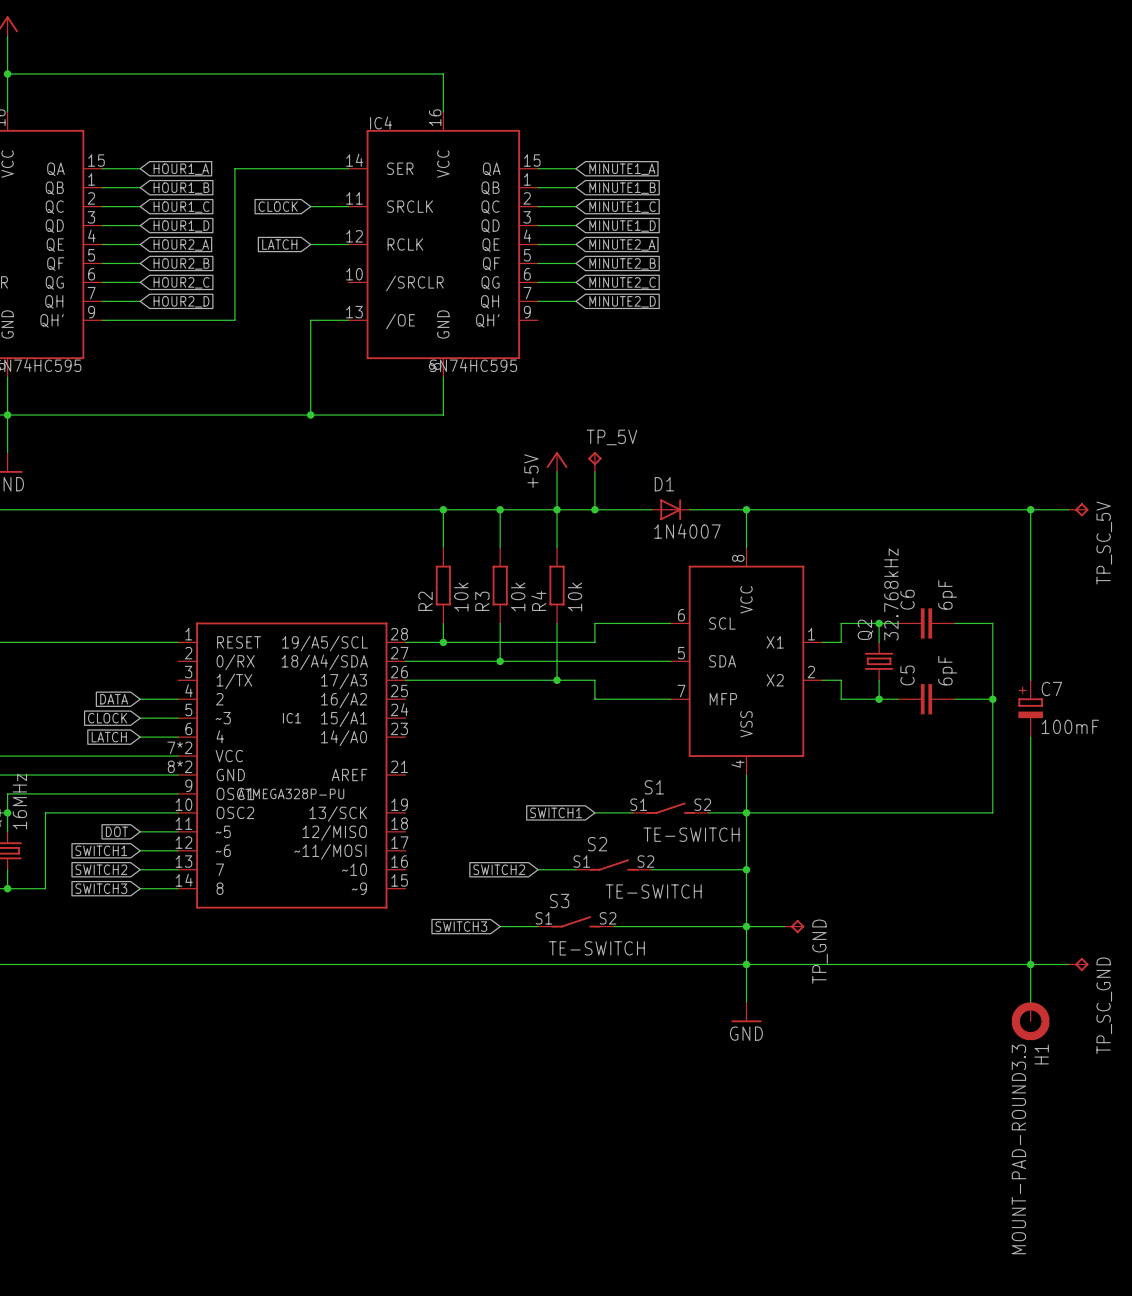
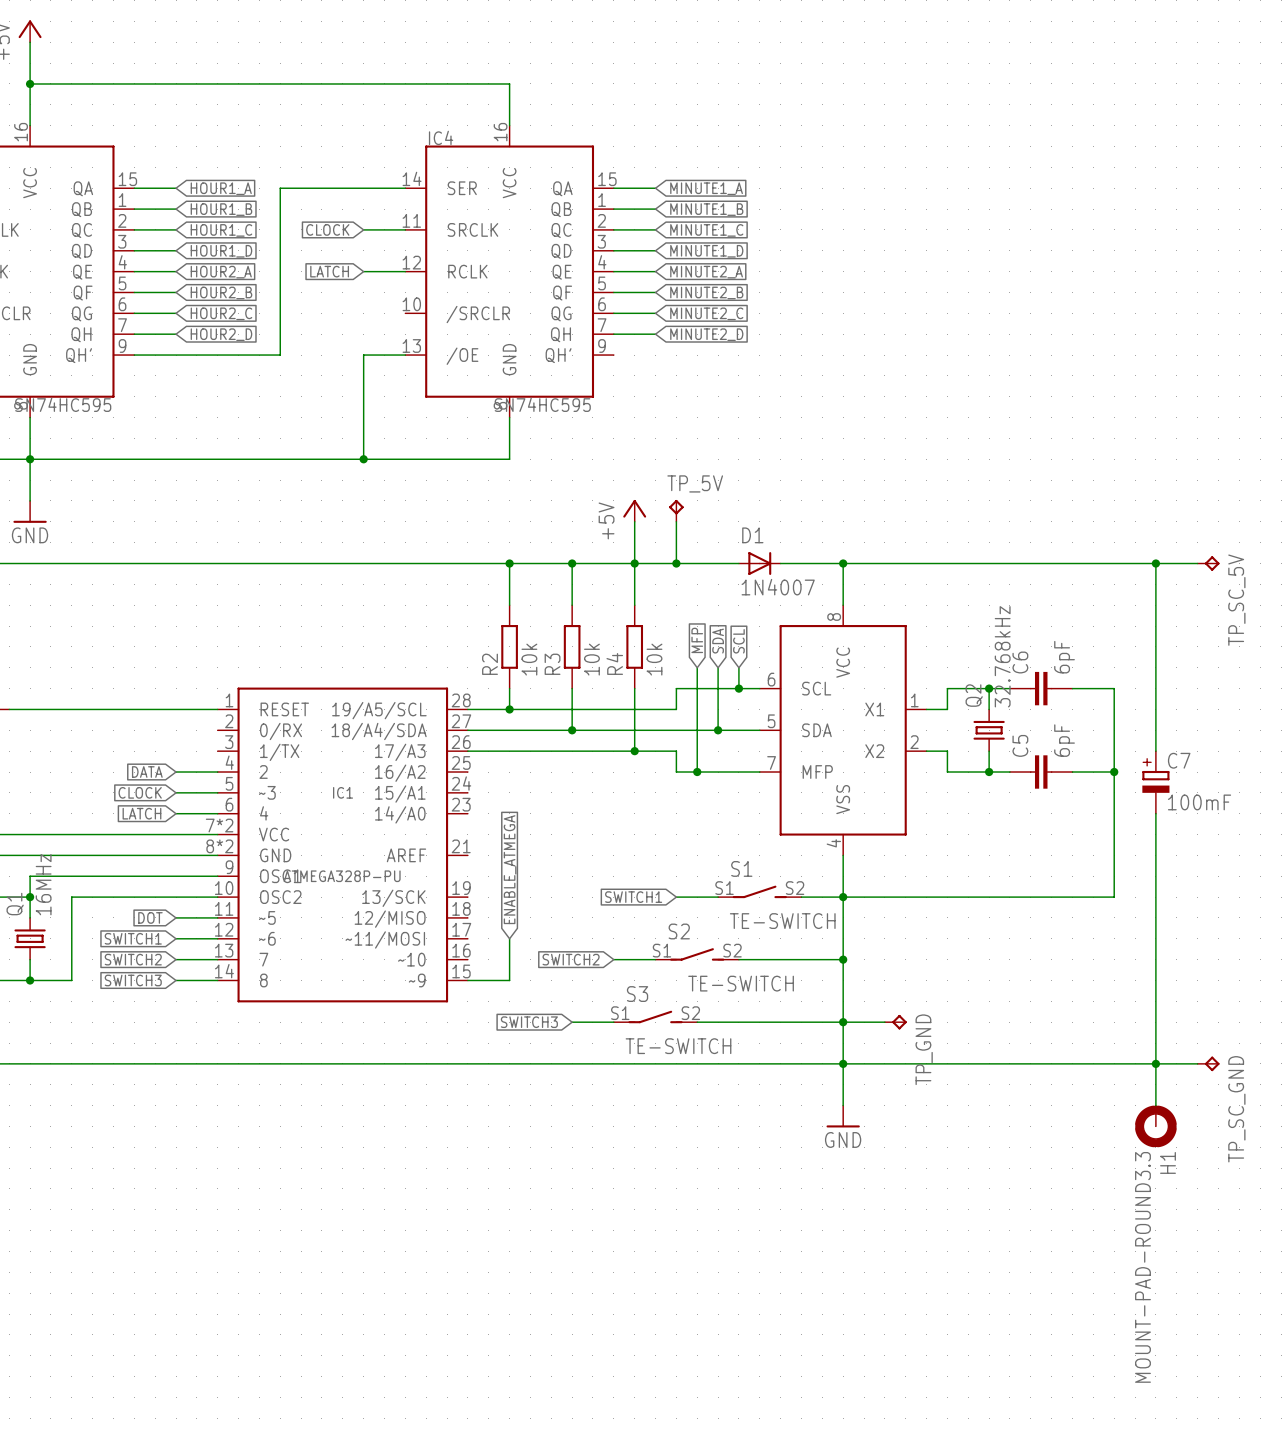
global label: none -> MFP (697, 640)
global label: none -> SDA (718, 641)
global label: none -> SCL (738, 641)
wire: none -> (697, 667) (697, 772)
wire: none -> (718, 667) (718, 730)
wire: none -> (738, 667) (738, 688)
junction: none -> (738, 688)
junction: none -> (718, 730)
junction: none -> (697, 772)
global label: none -> ENABLE_ATMEGA (510, 869)
wire: none -> (509, 938) (509, 980) (467, 980)

